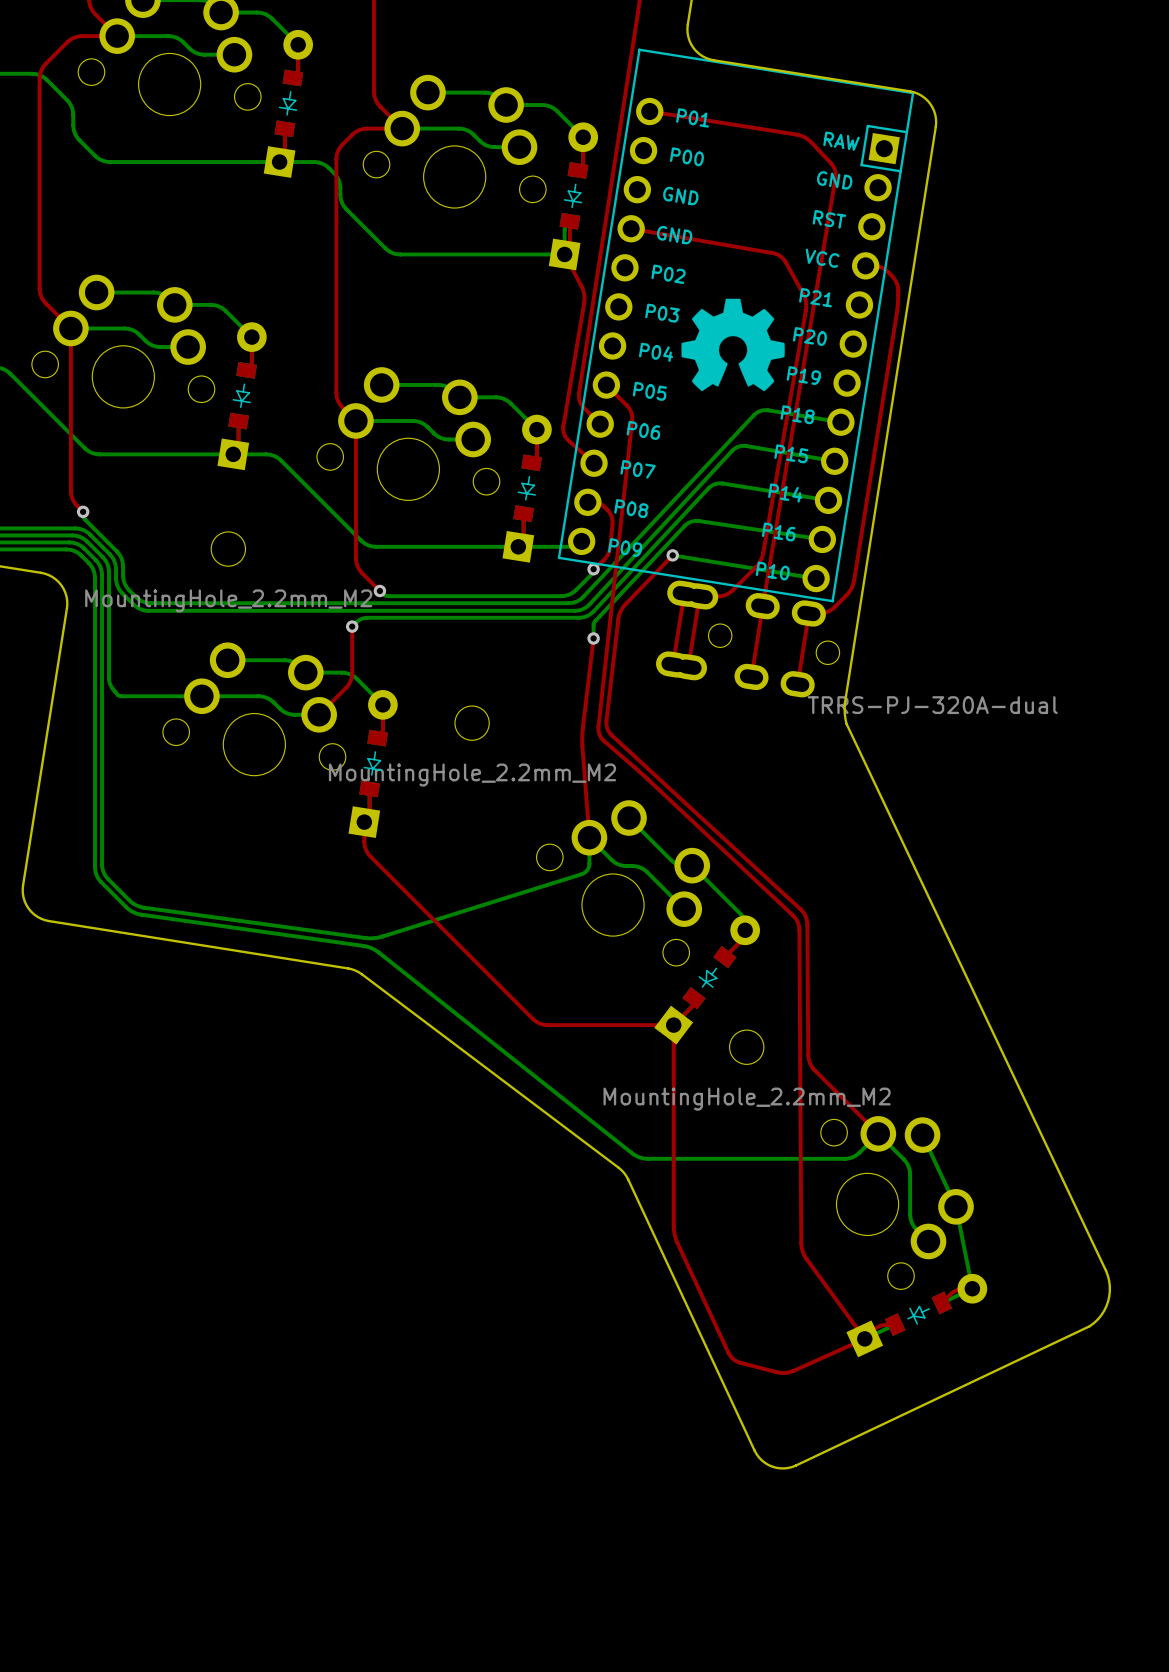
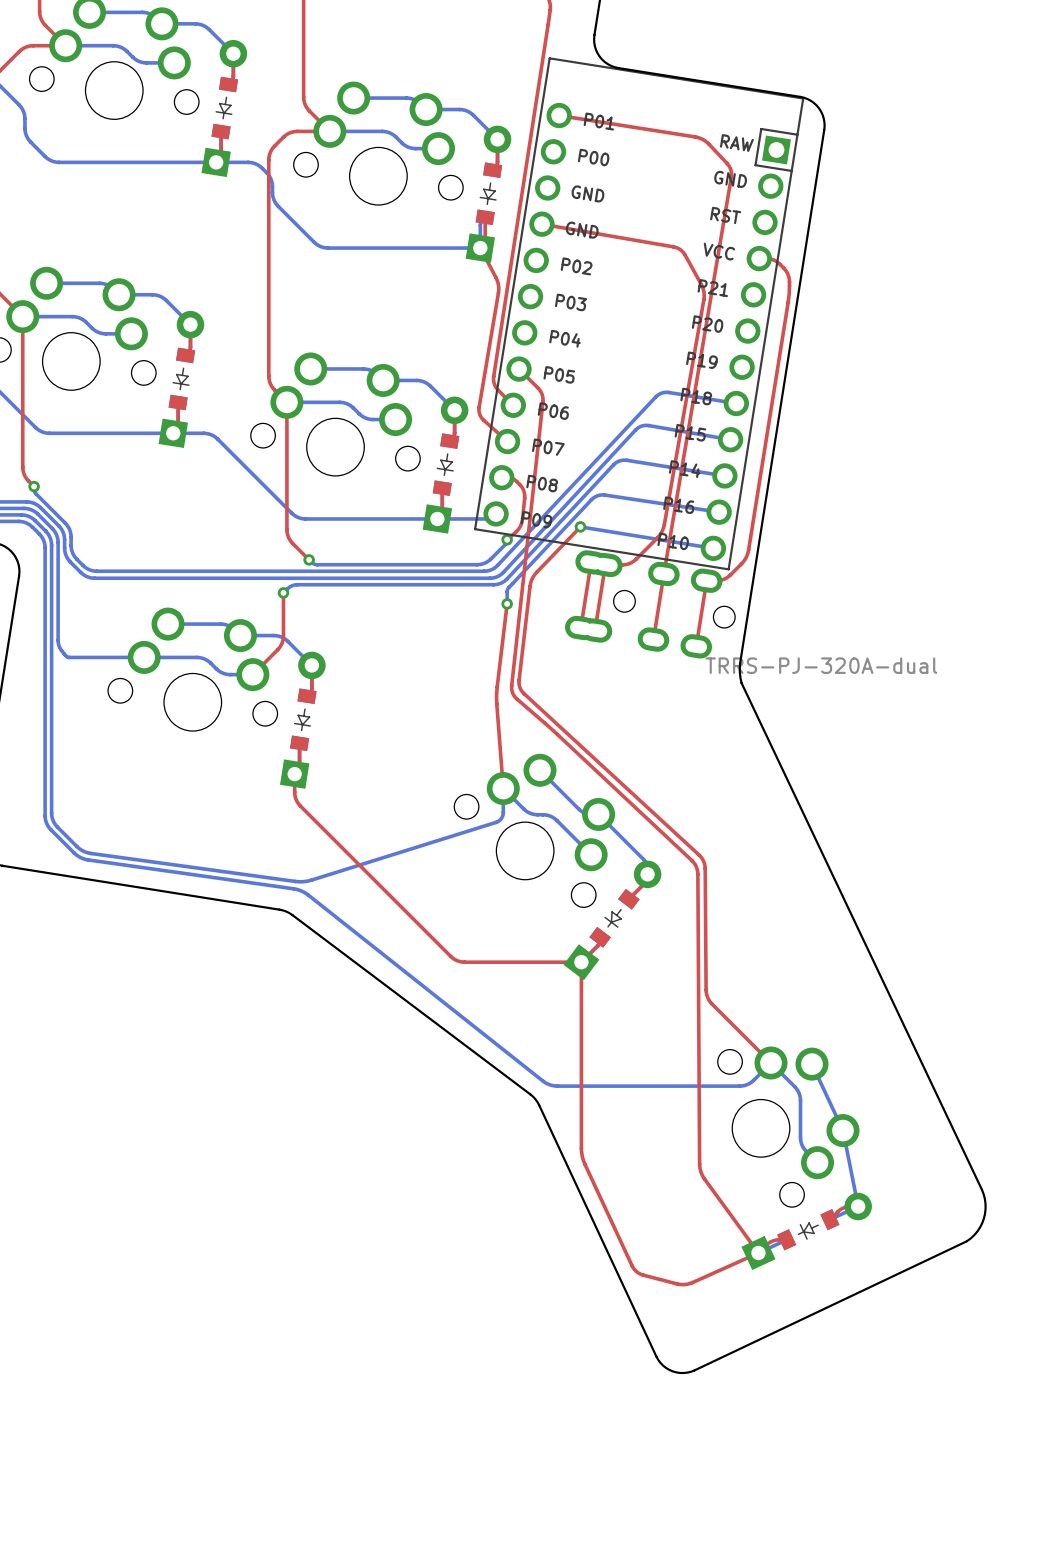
drawing: [681, 298, 785, 392] -> none
part: MountingHole_2.2mm_M2 (228, 549) -> none
part: MountingHole_2.2mm_M2 (472, 723) -> none
part: MountingHole_2.2mm_M2 (746, 1047) -> none

